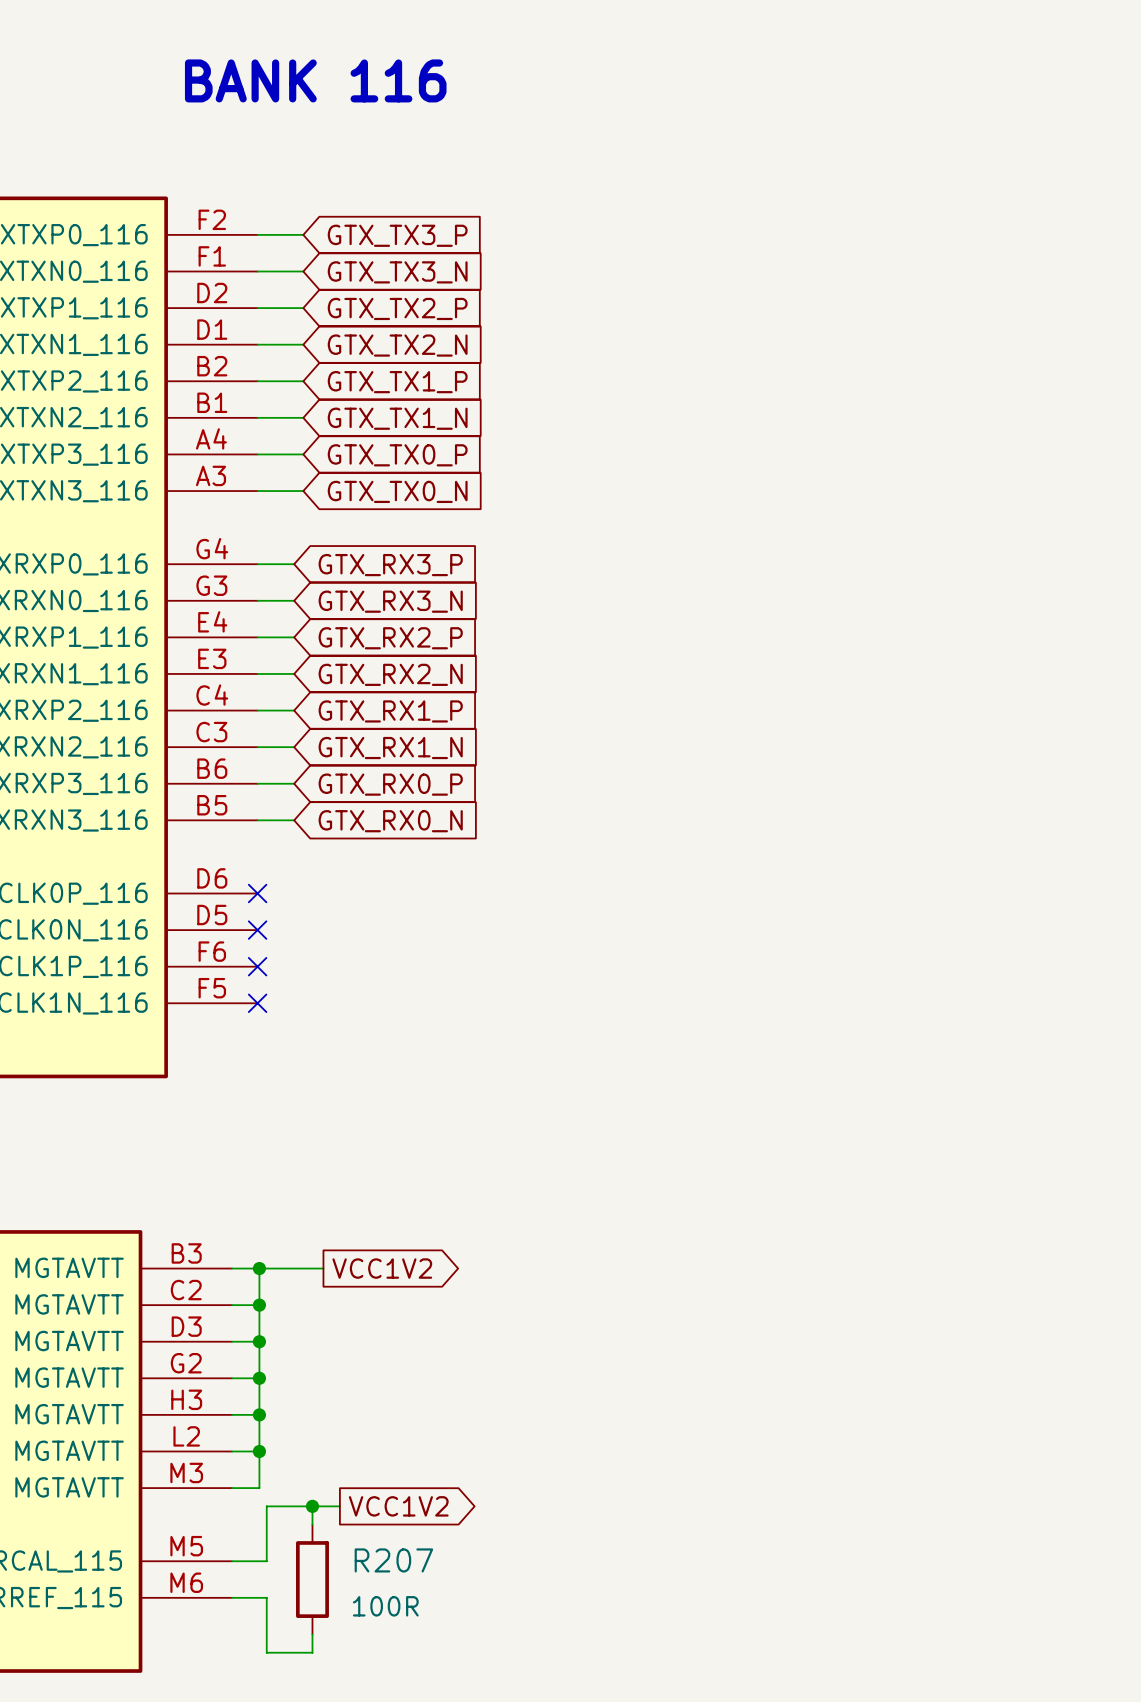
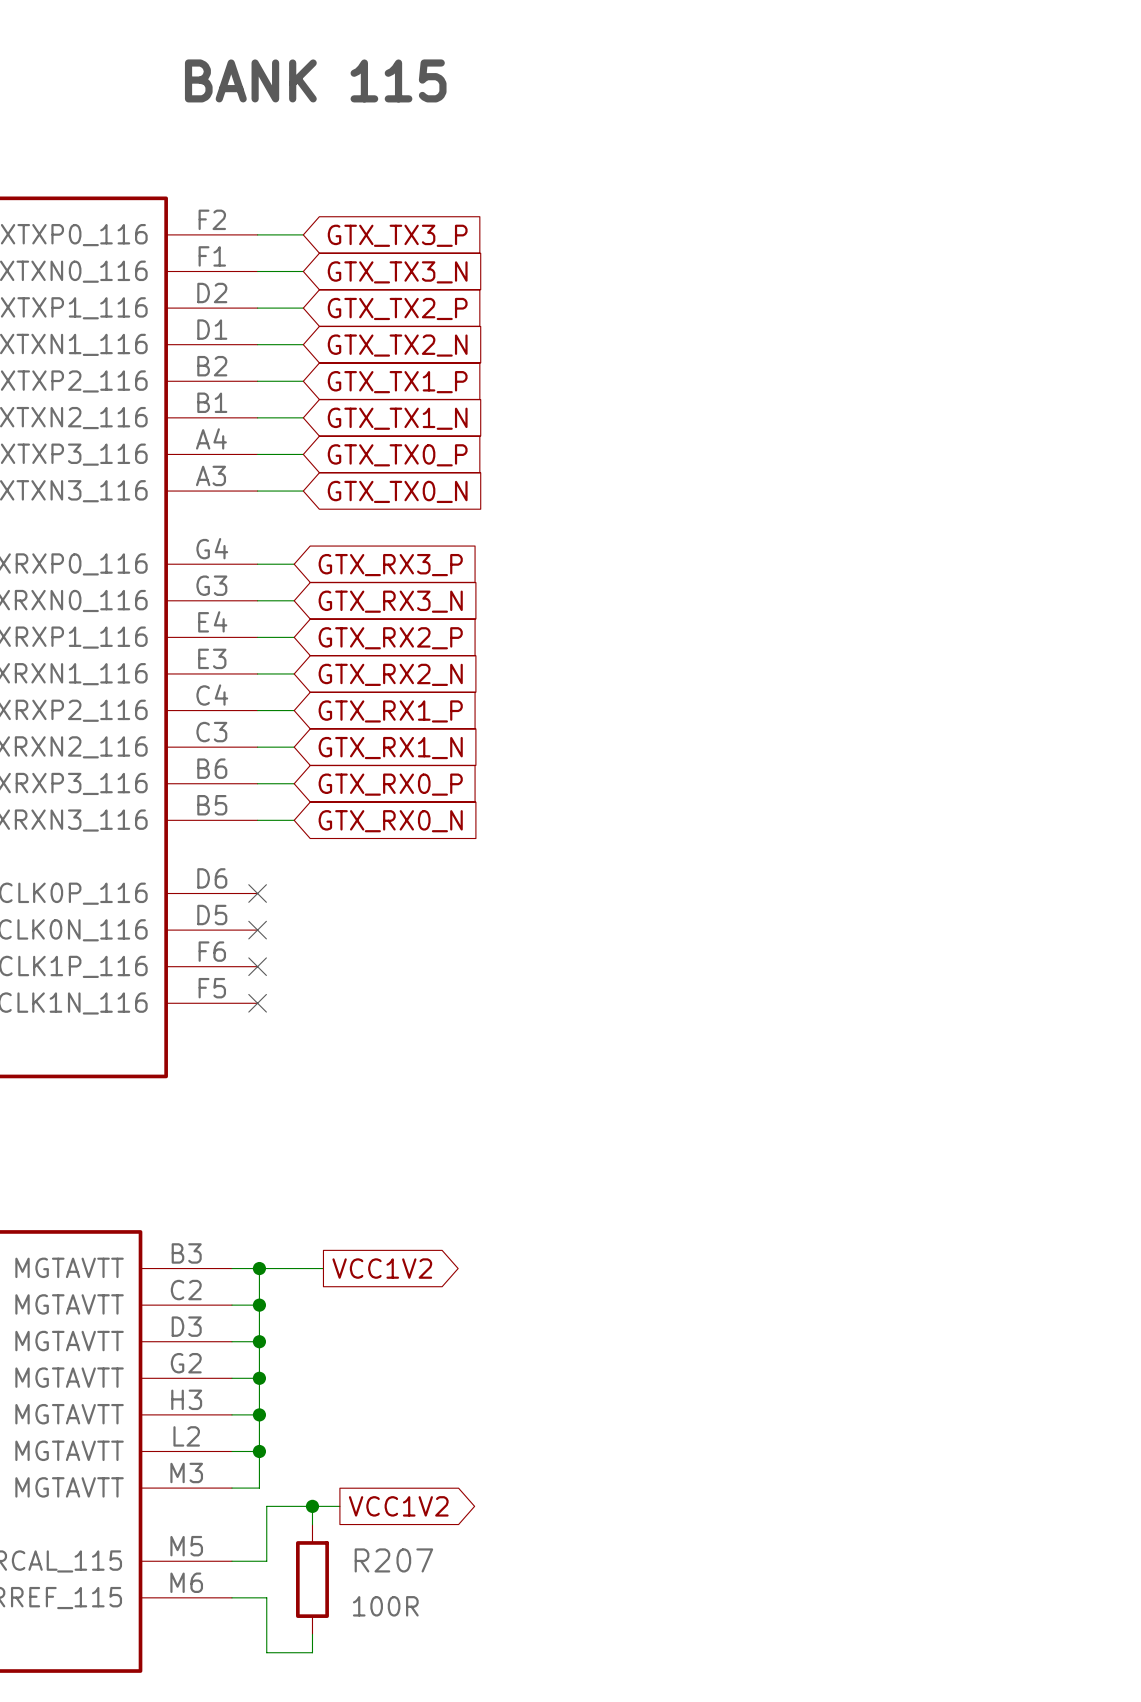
text: BANK 116 (315, 80) -> BANK 115 (315, 80)

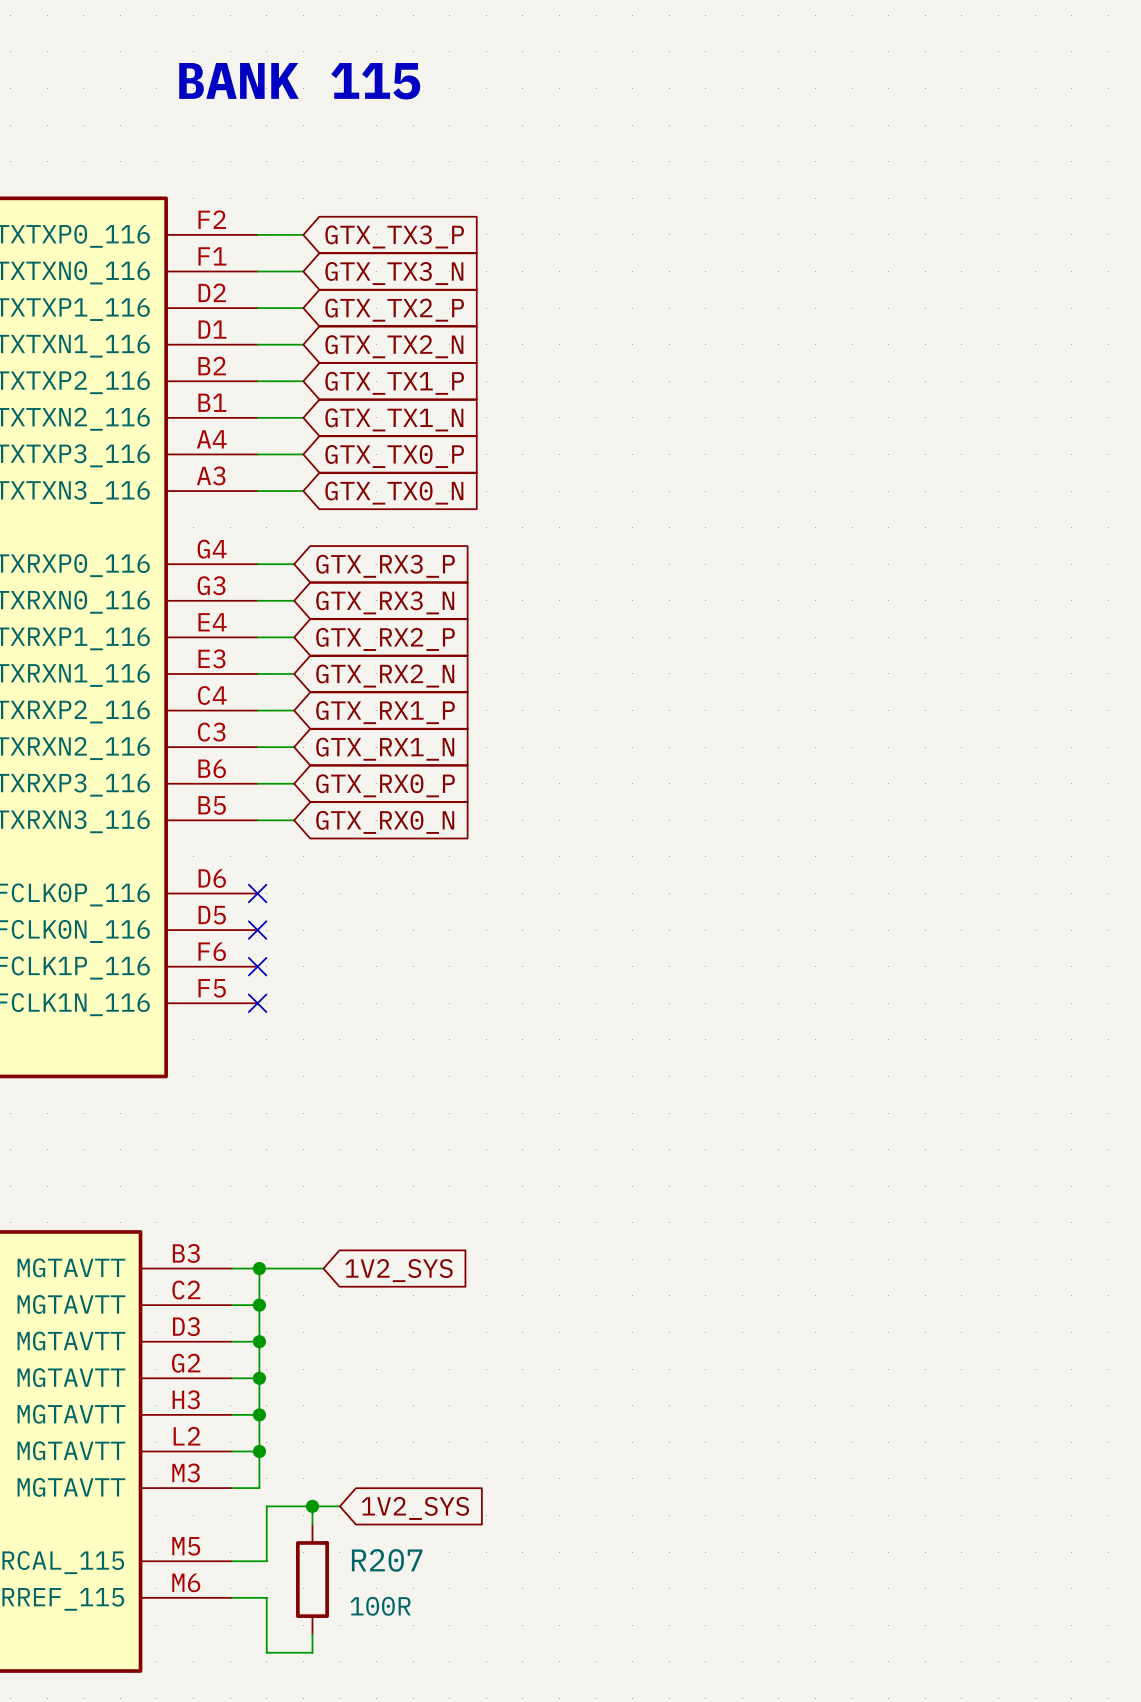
global label shape: output (382, 1268) -> input (399, 1270)
global label: VCC1V2 (382, 1268) -> 1V2_SYS (399, 1270)
global label shape: output (398, 1506) -> input (415, 1508)
global label: VCC1V2 (398, 1506) -> 1V2_SYS (415, 1508)

